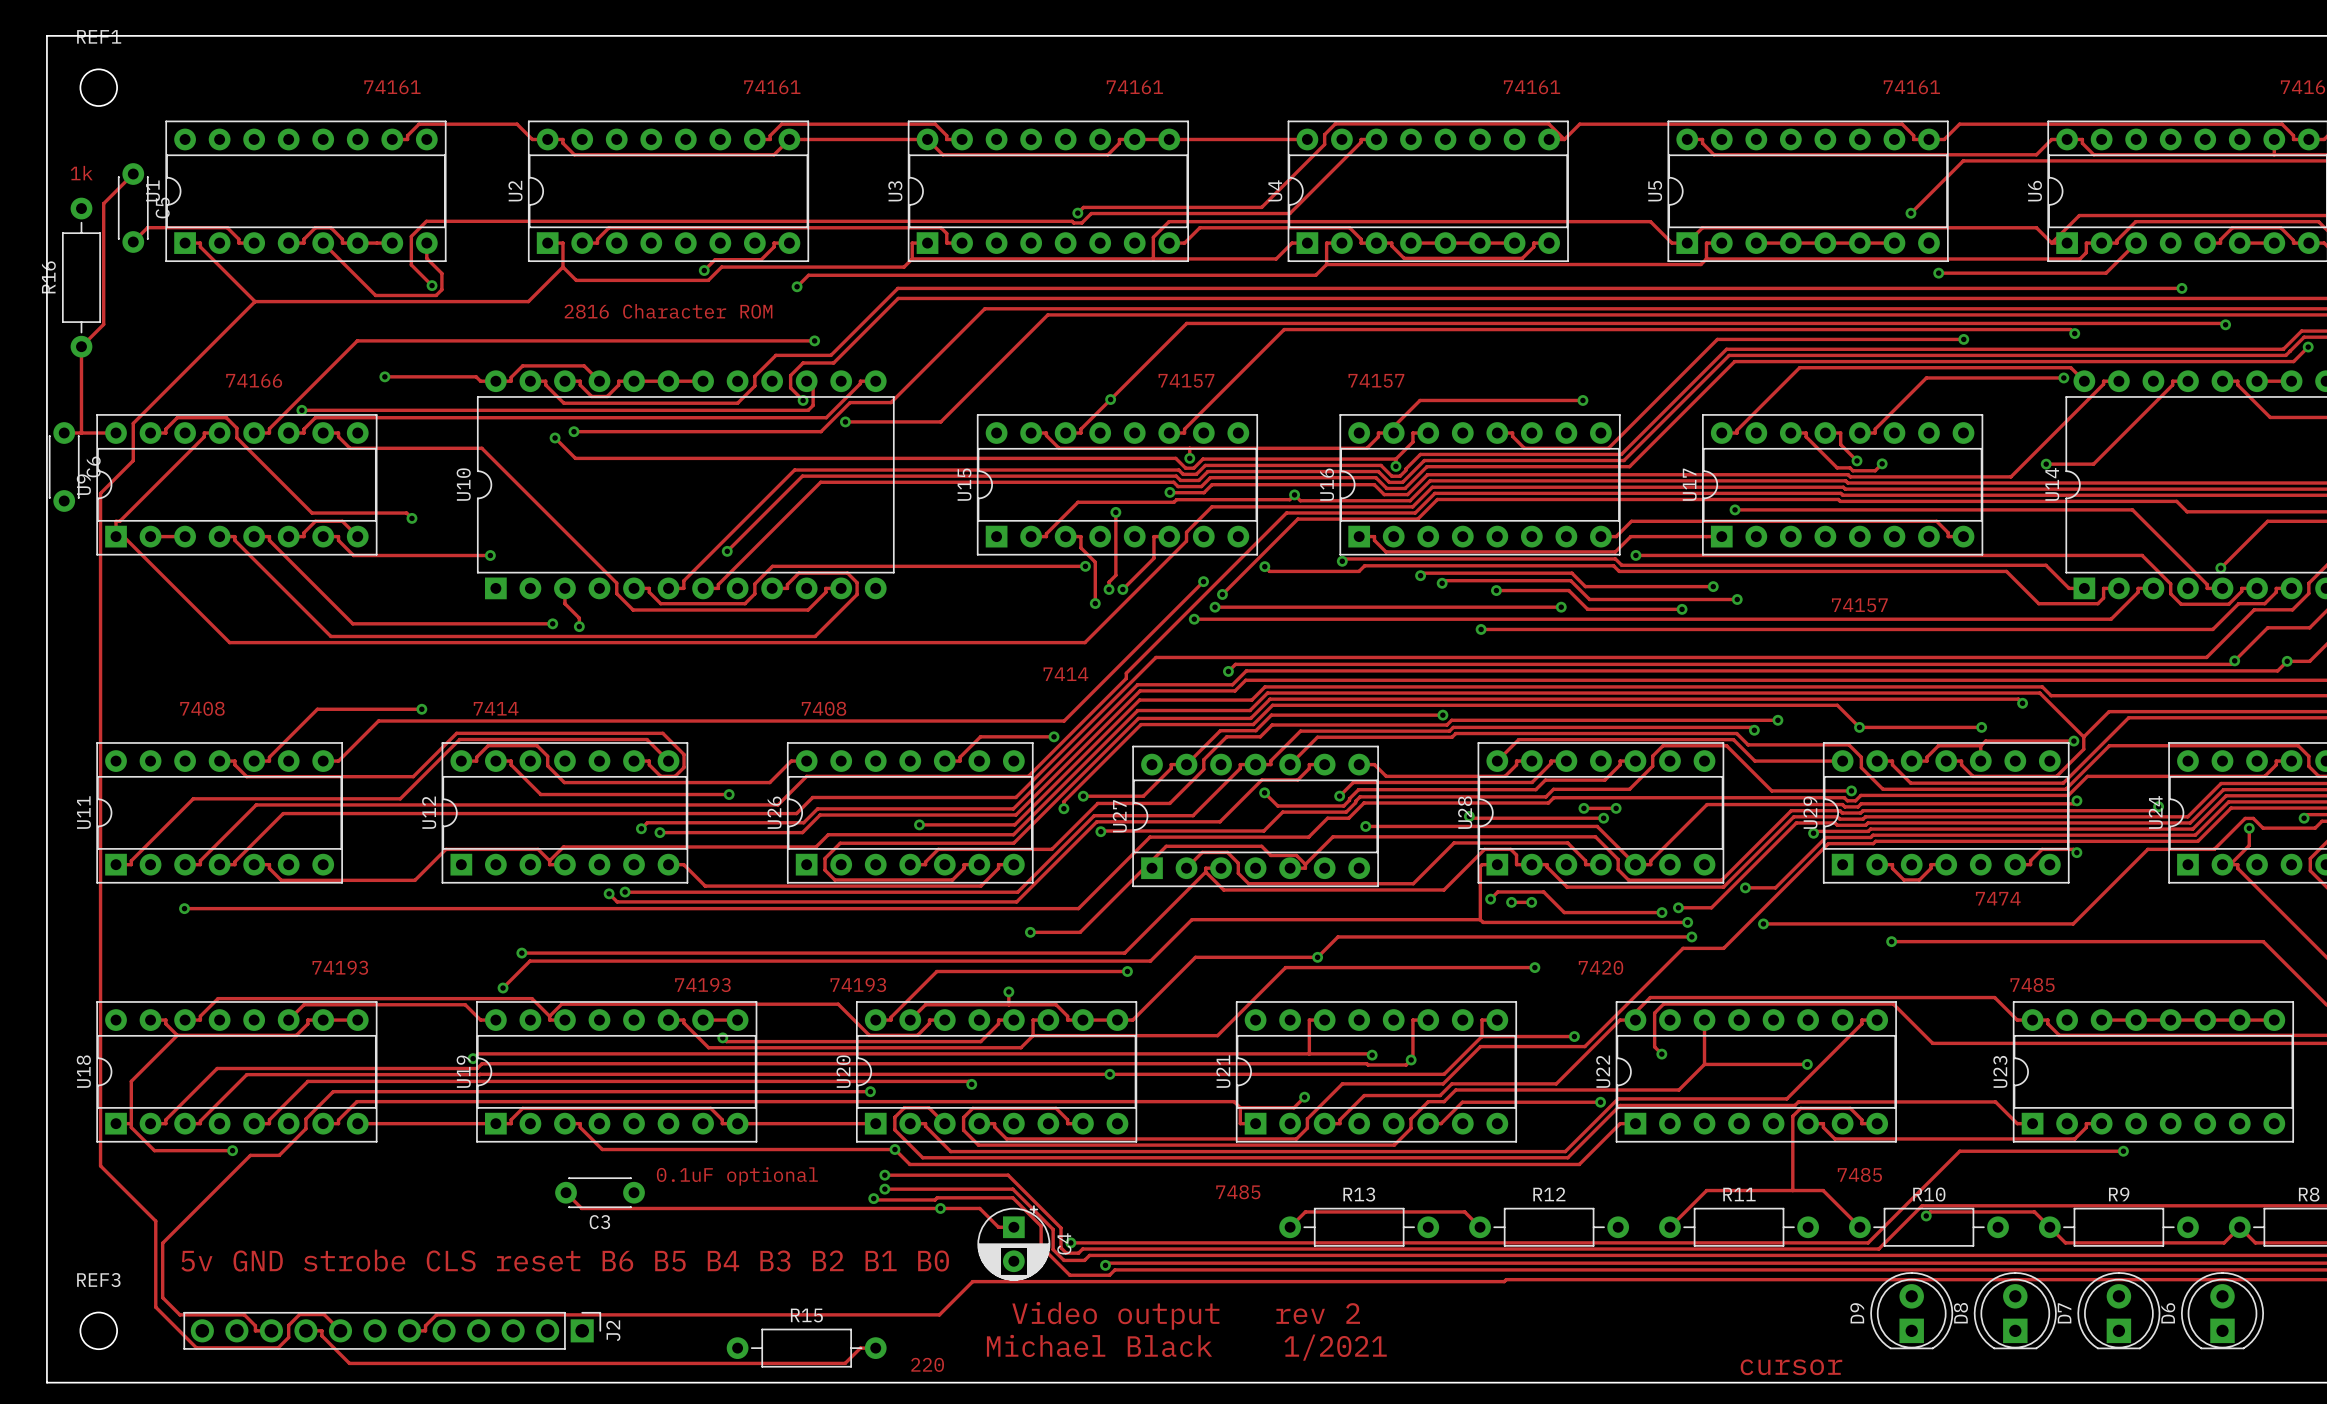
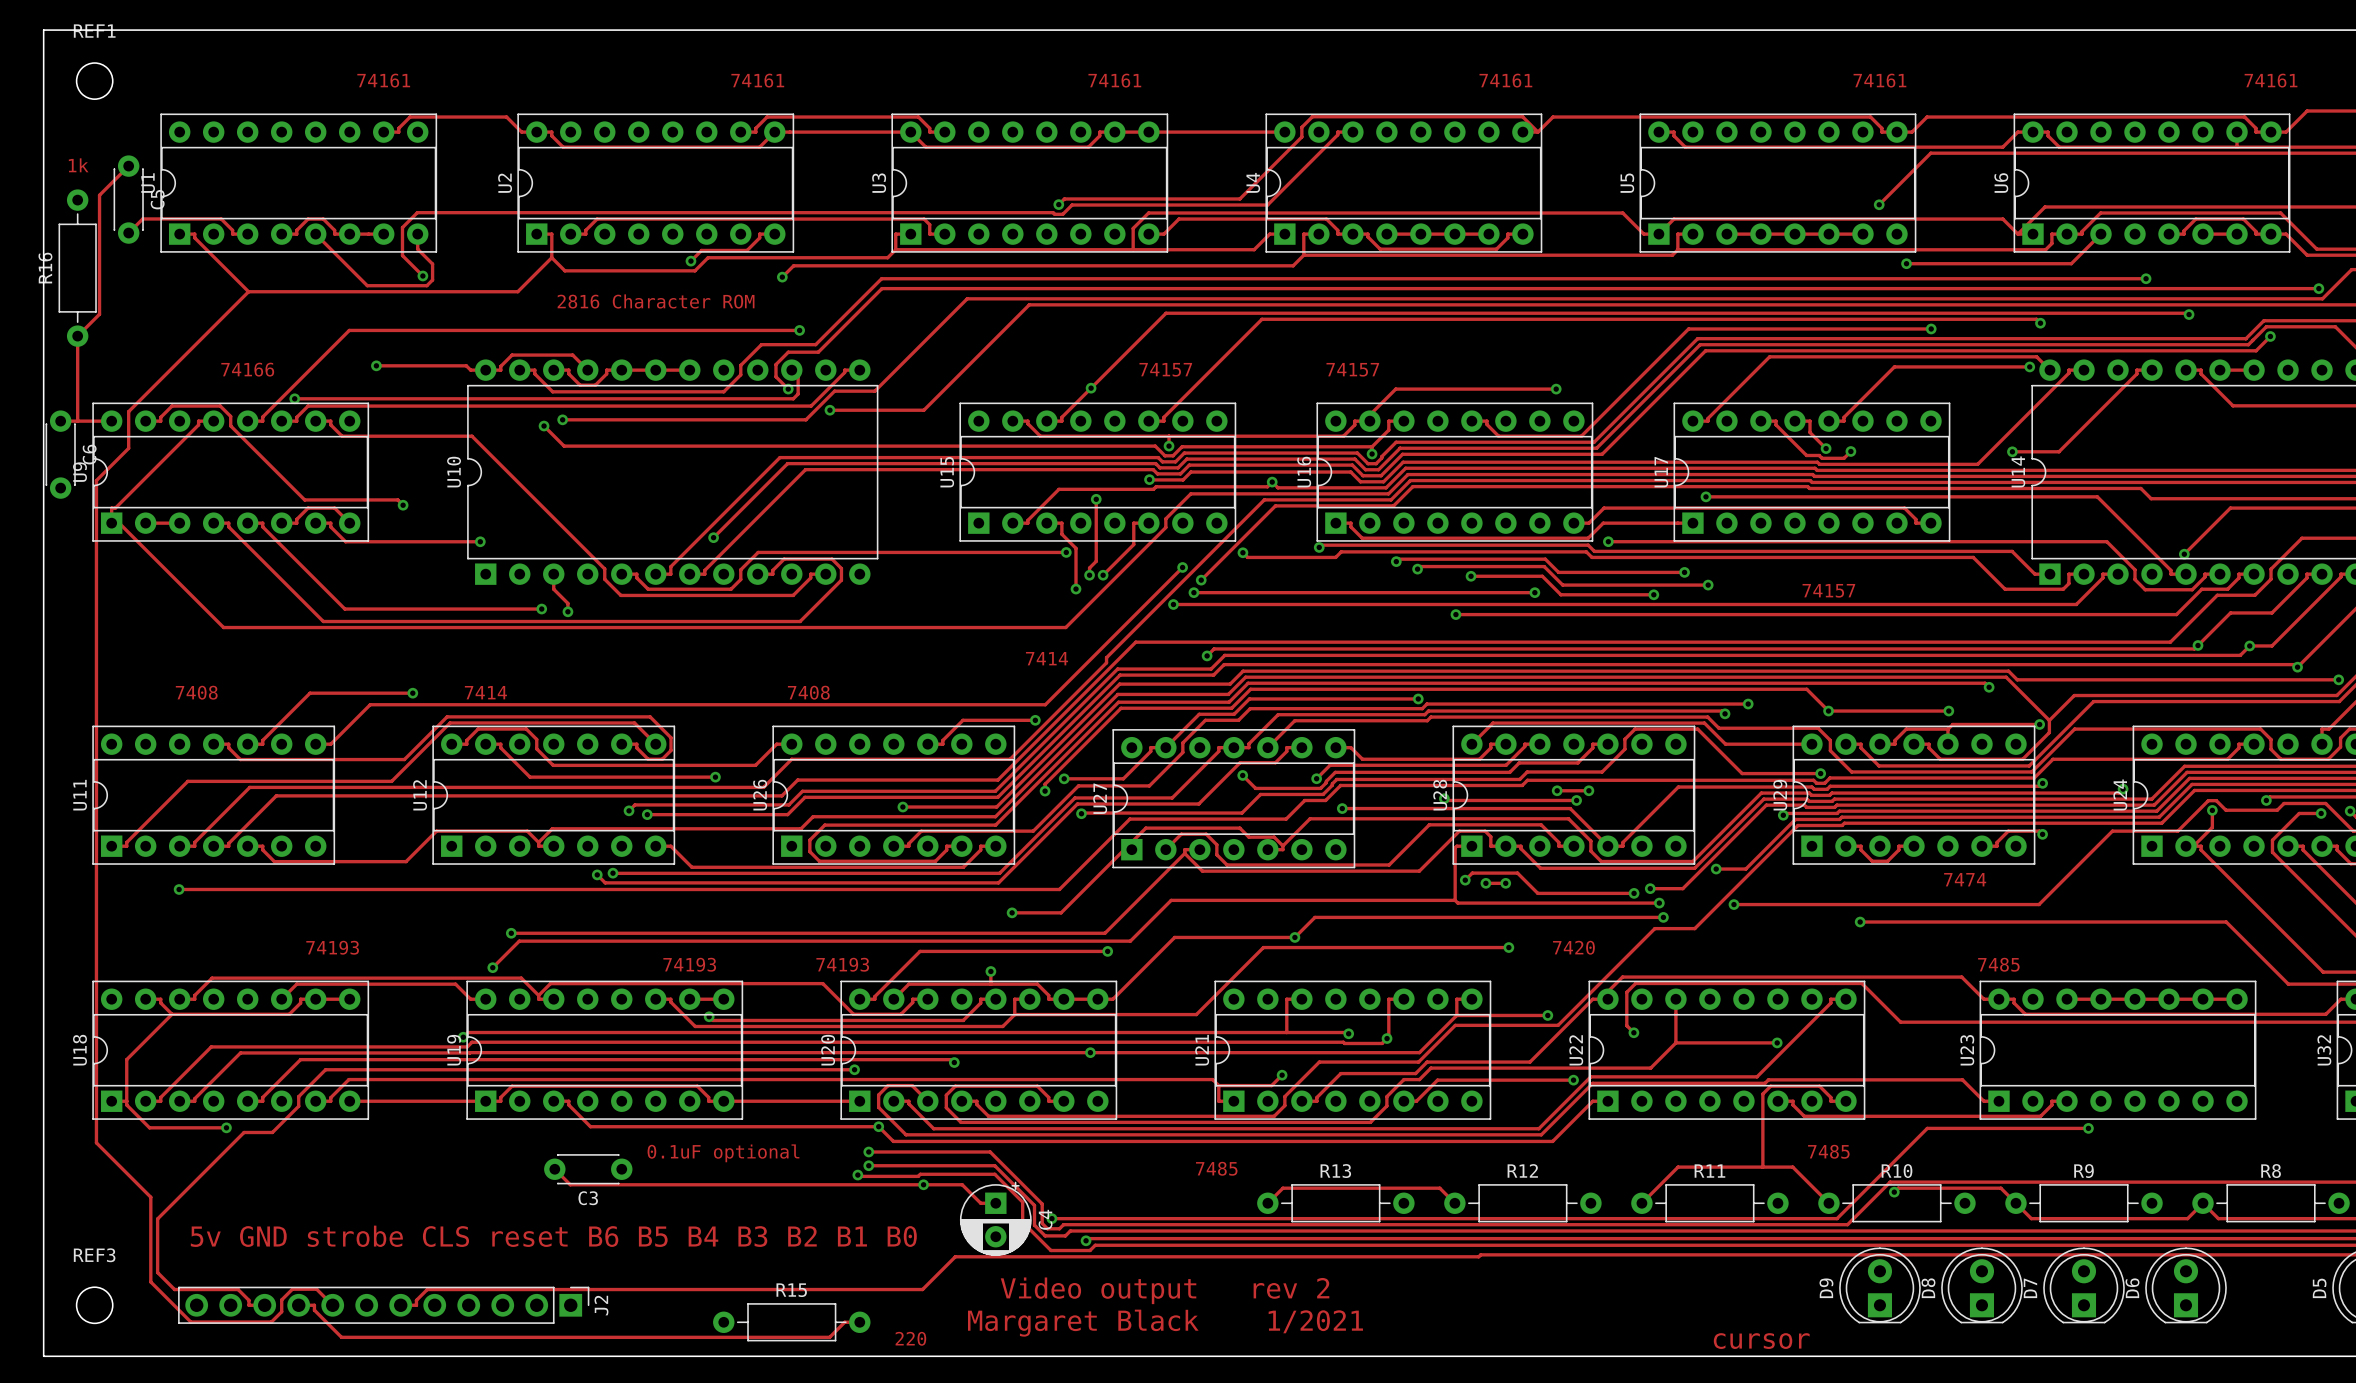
text: Michael Black 1/2021 (1186, 1347) -> Margaret Black 1/2021 (1165, 1323)

